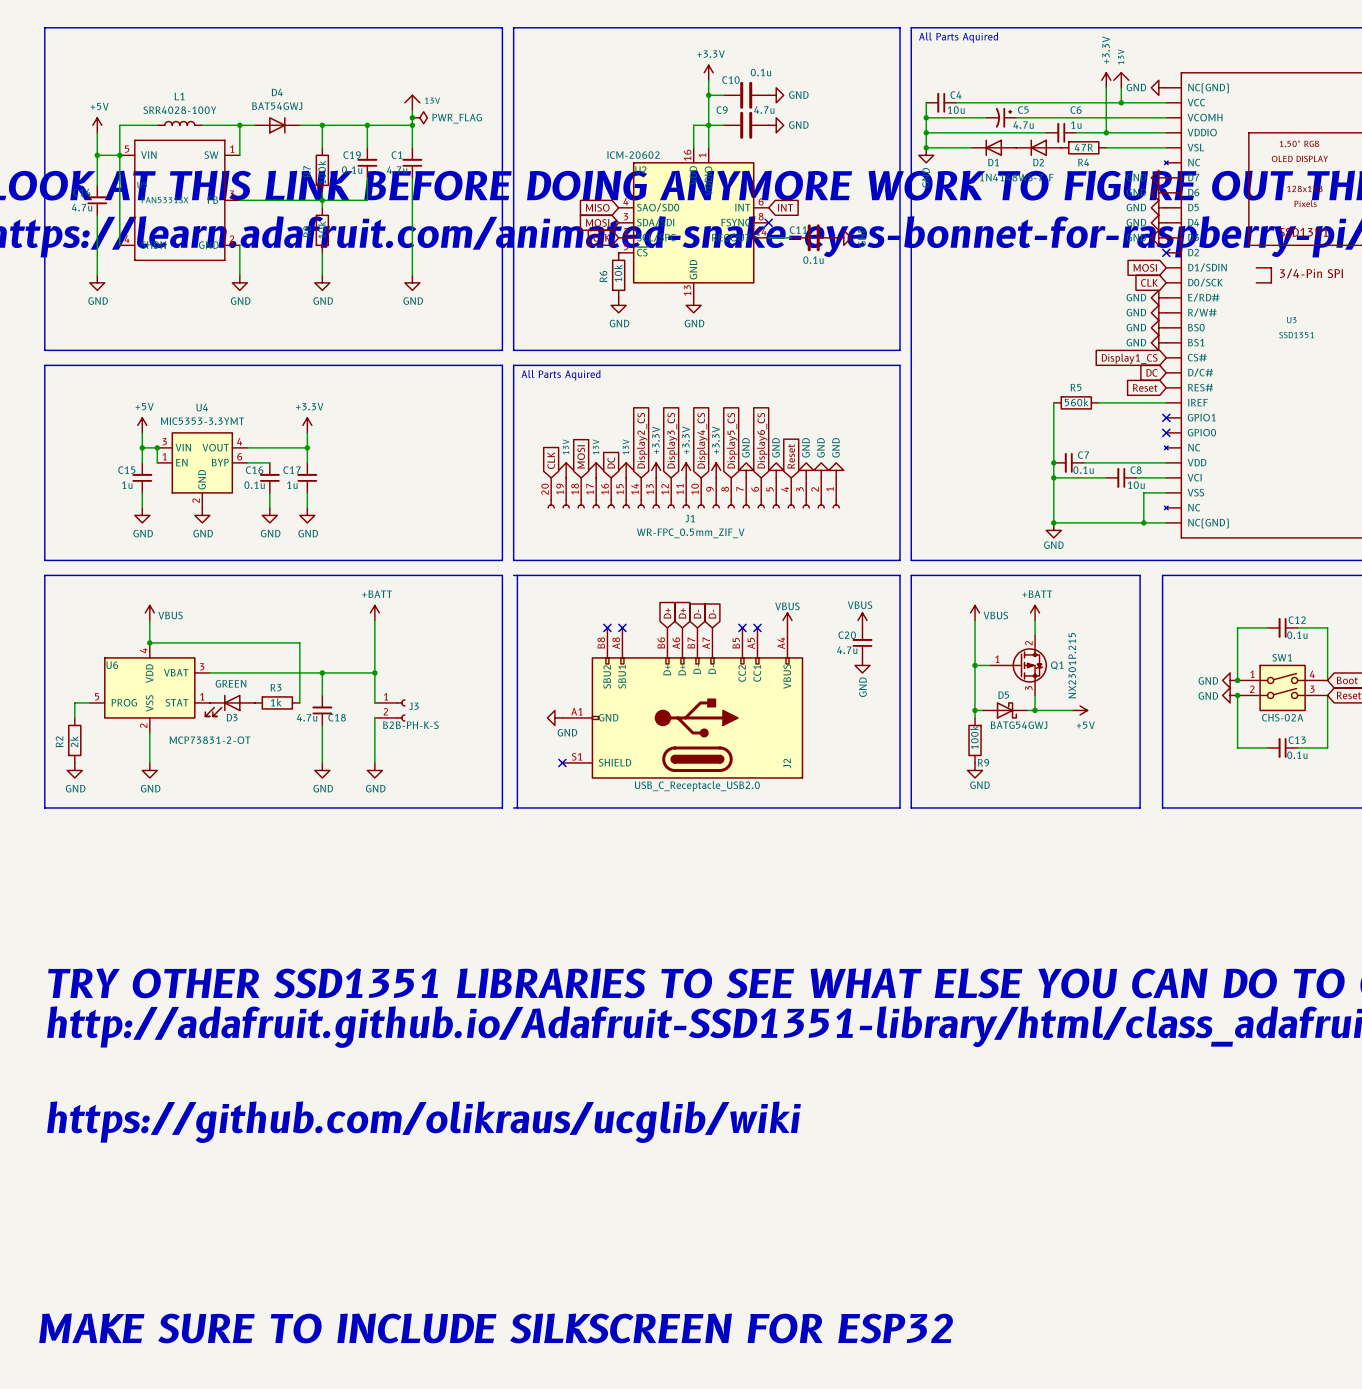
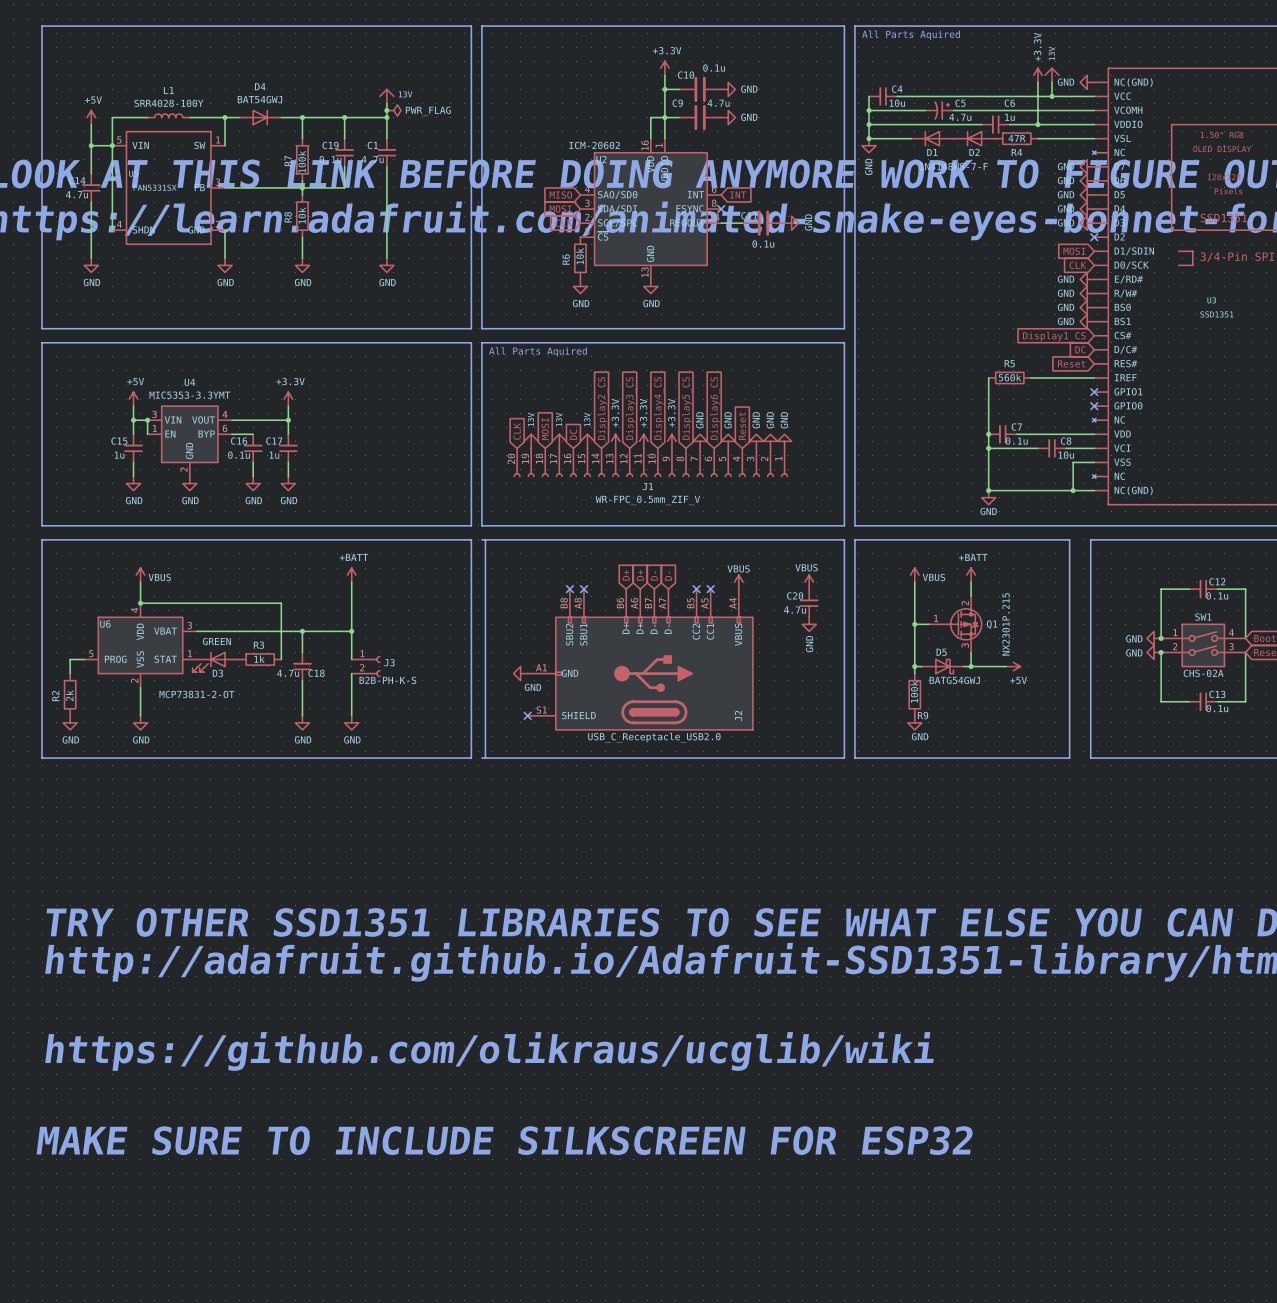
text position: MAKE SURE TO INCLUDE SILKSCREEN FOR ESP32 (496, 1328) -> MAKE SURE TO INCLUDE SILKSCREEN FOR ESP32 (504, 1140)

